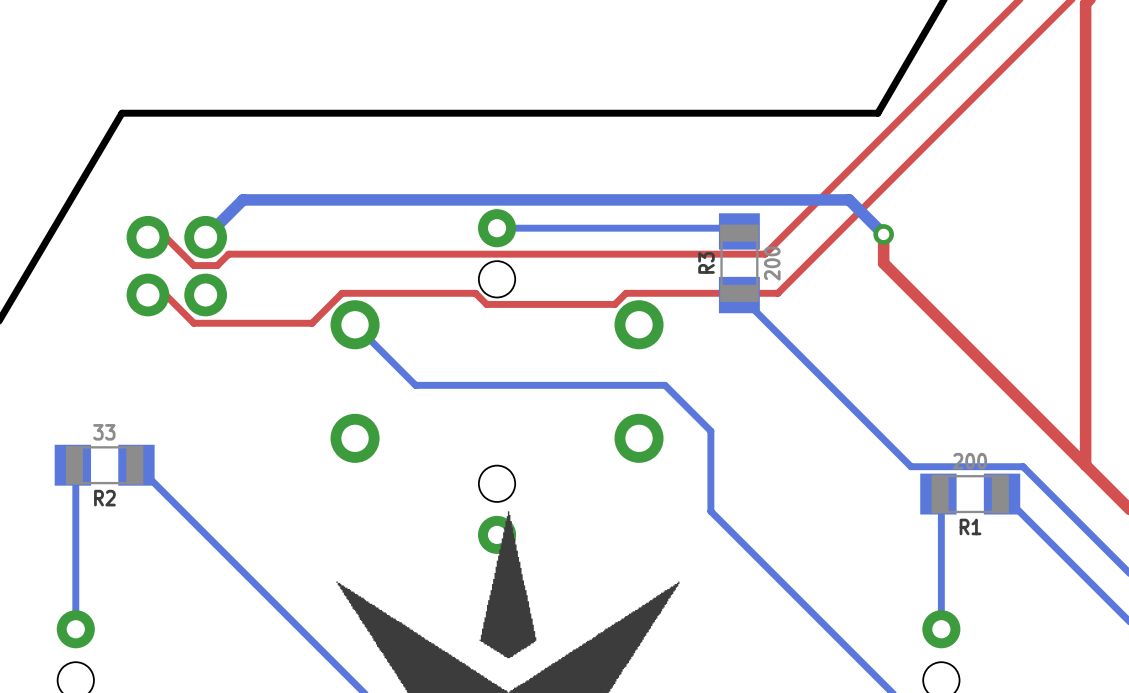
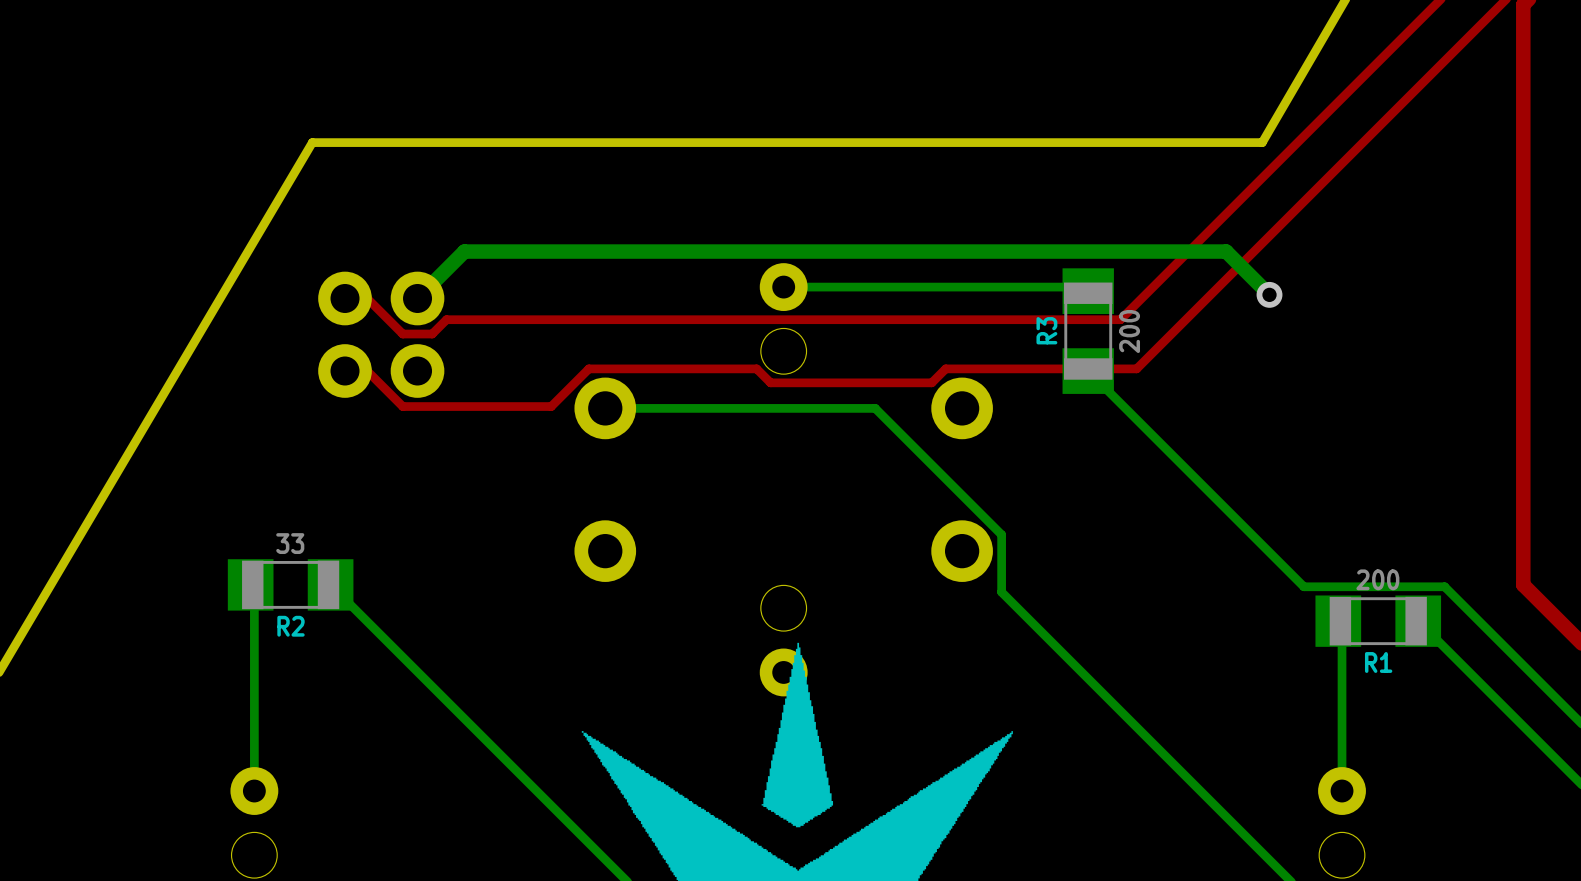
top track: (883, 234) (883, 263) (1085, 465) -> none
bottom track: (355, 324) (415, 385) (665, 385) (710, 431) (710, 511) -> (605, 408) (875, 408) (1001, 534) (1001, 592) (1052, 642)

